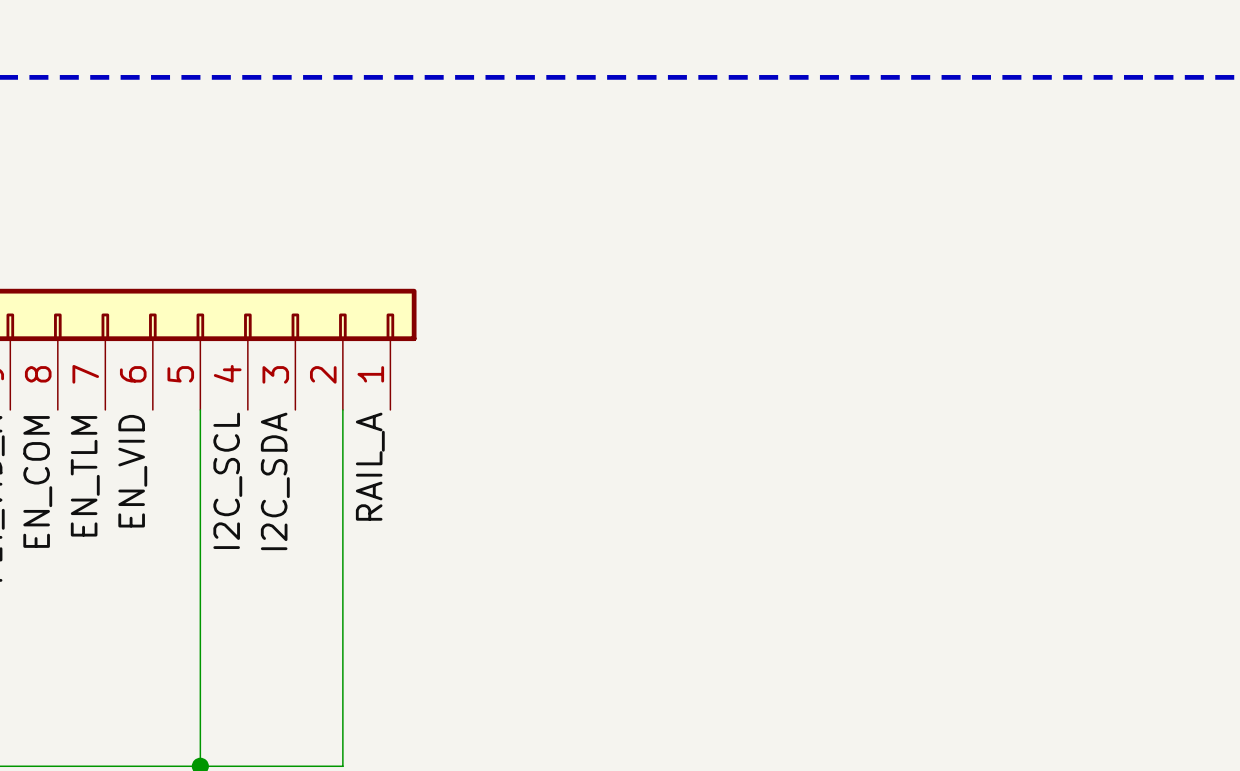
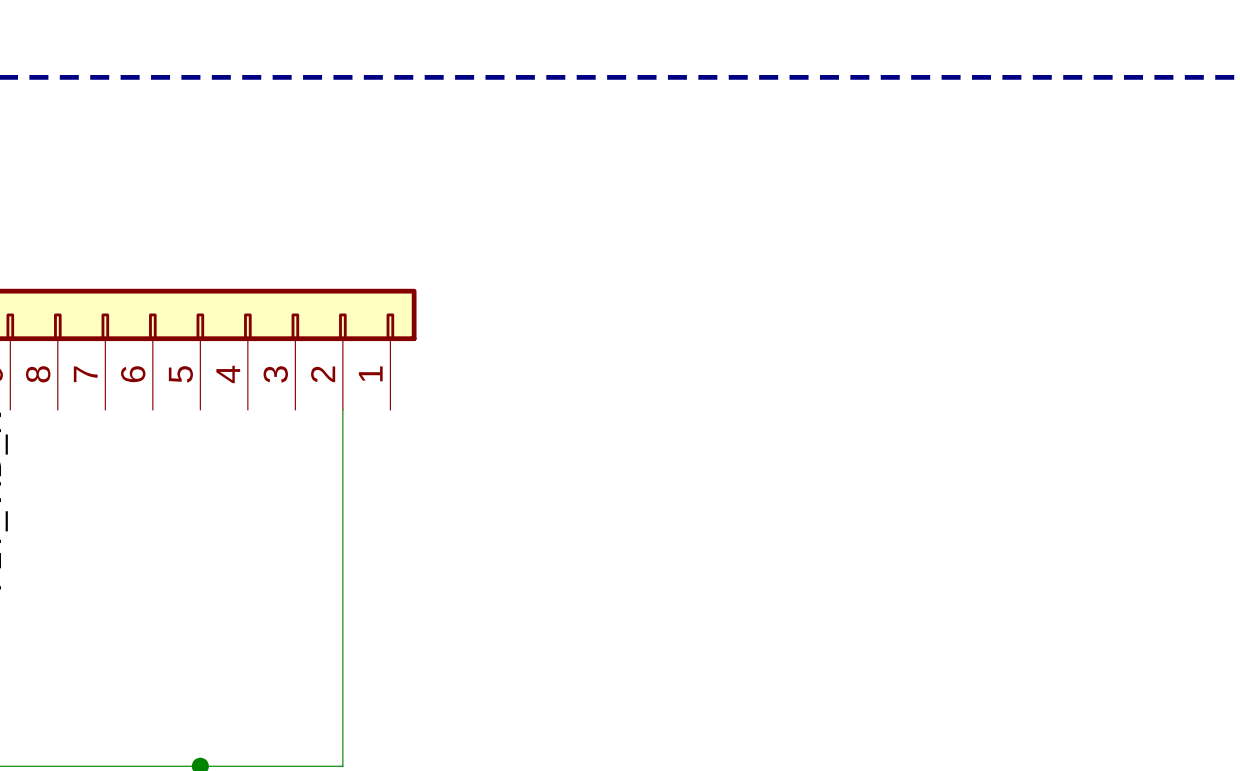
wire: (200, 409) (200, 766) -> none
label: RAIL_A (370, 466) -> none
label: EN_VID (132, 471) -> none
label: EN_TLM (85, 476) -> none
label: I2C_SCL (227, 480) -> none
label: EN_COM (37, 481) -> none
label: I2C_SDA (275, 481) -> none

